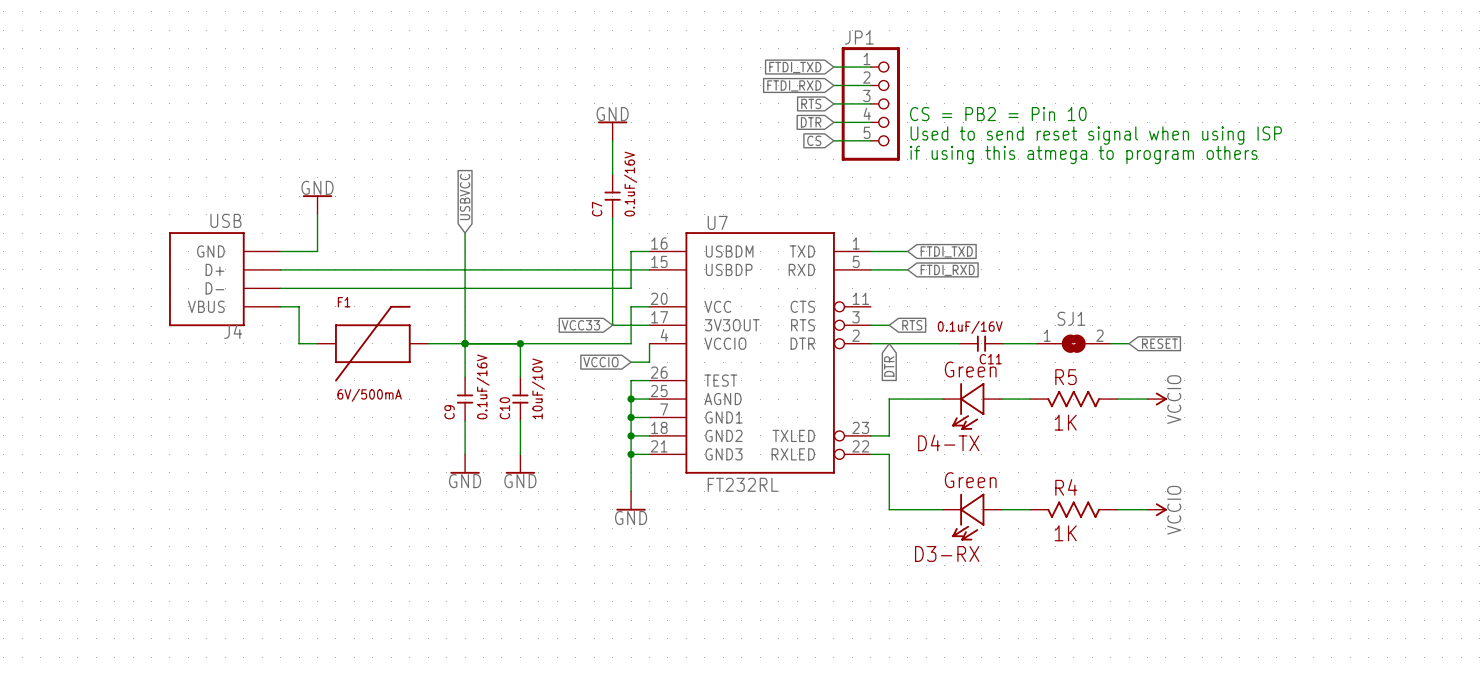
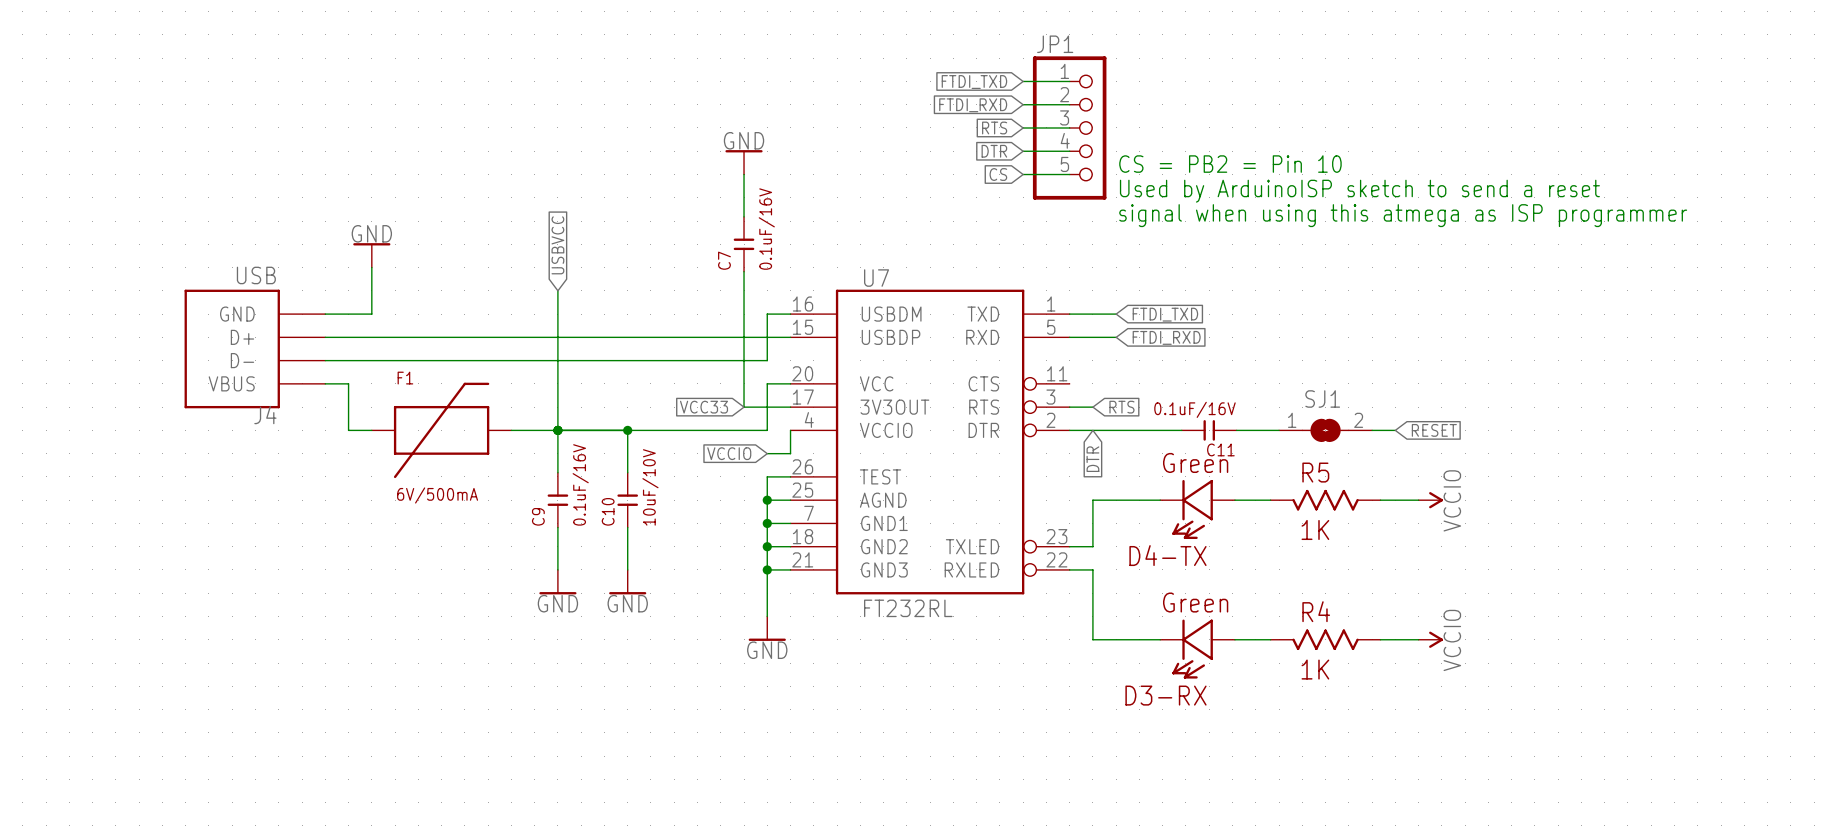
text: CS = PB2 = Pin 10 (998, 114) -> none
text: Used to send reset signal when using ISP (1096, 135) -> CS = PB2 = Pin 10 (1230, 164)
text: if using this atmega to program others (1083, 154) -> Used by ArduinoISP sketch to send a reset (1359, 191)
text: none -> signal when using this atmega as ISP programmer (1403, 215)

